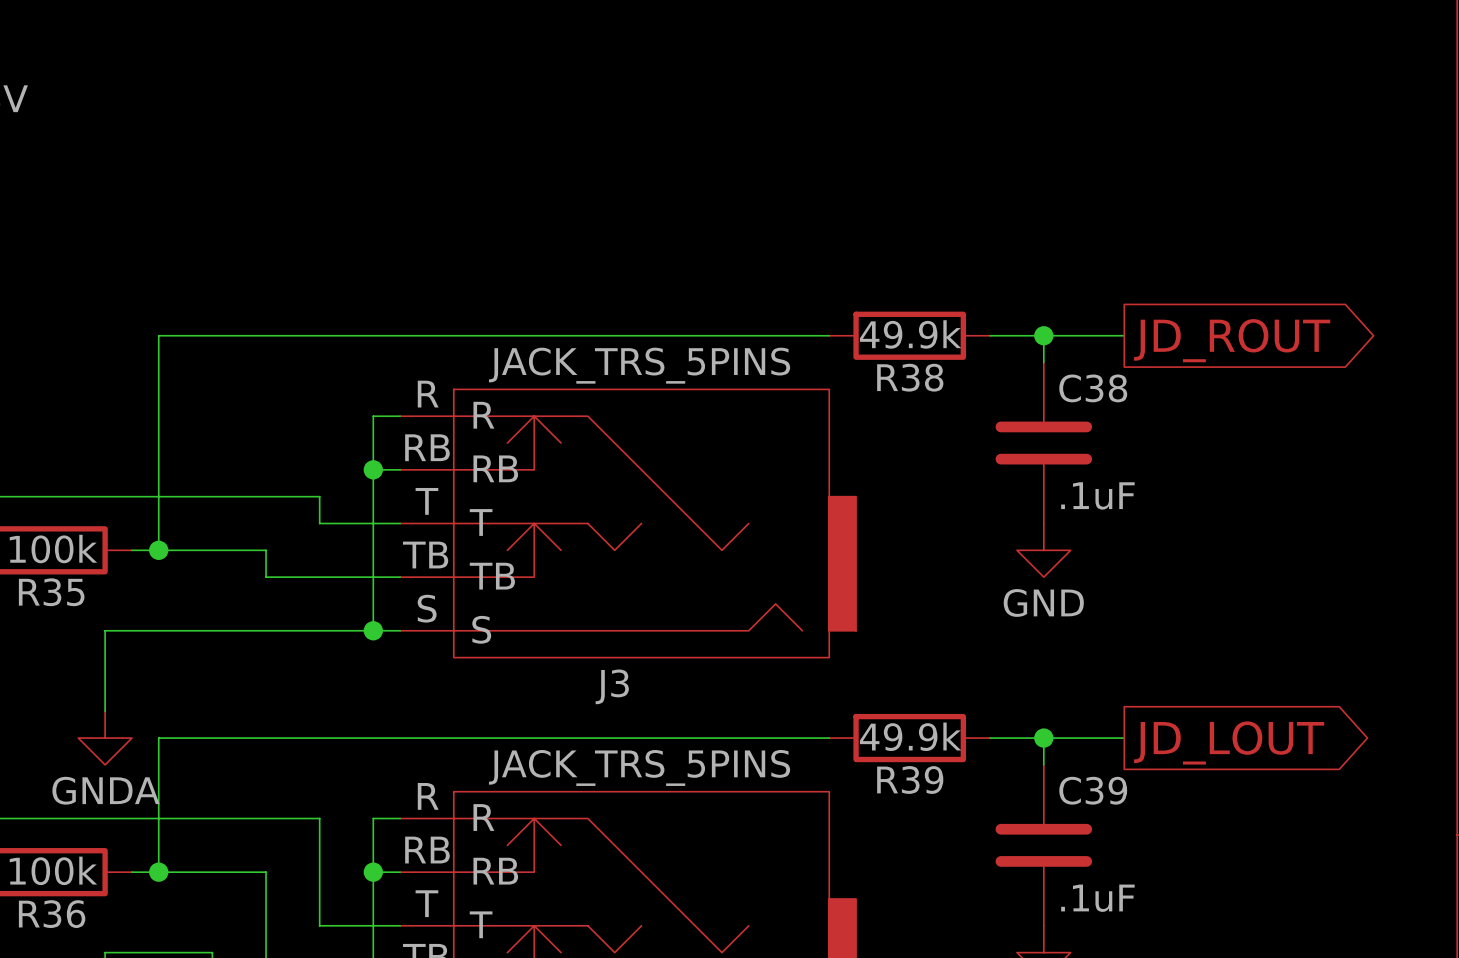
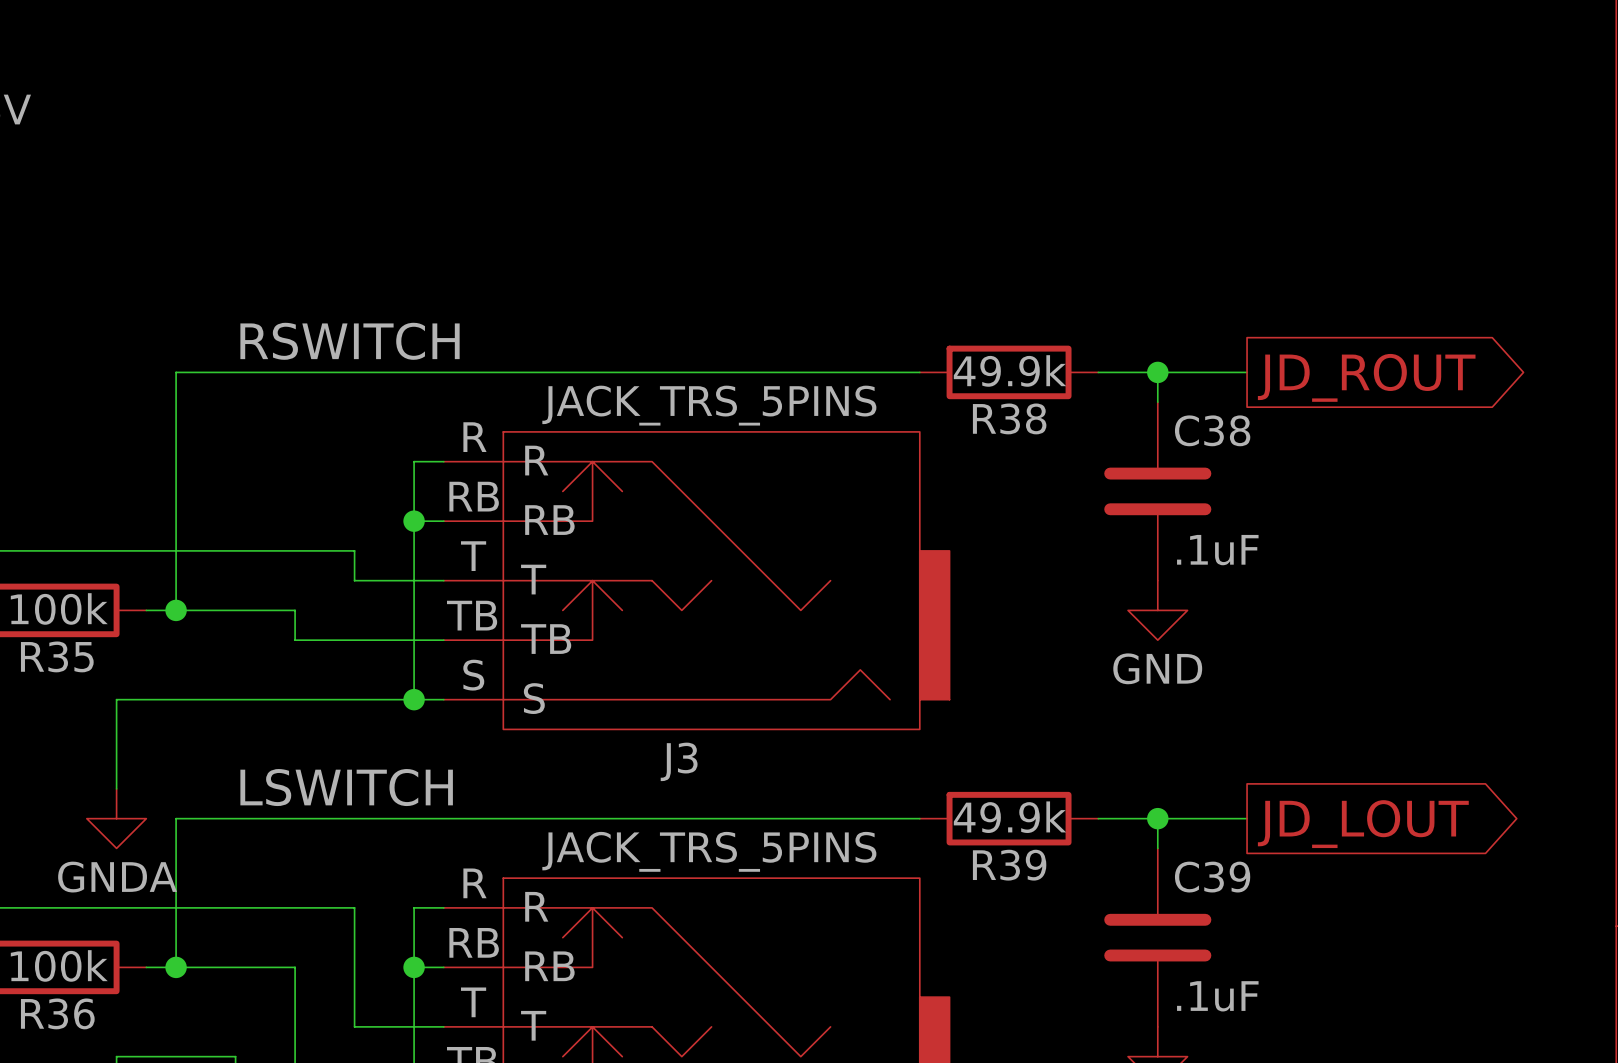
label: none -> RSWITCH (350, 341)
label: none -> LSWITCH (346, 787)

